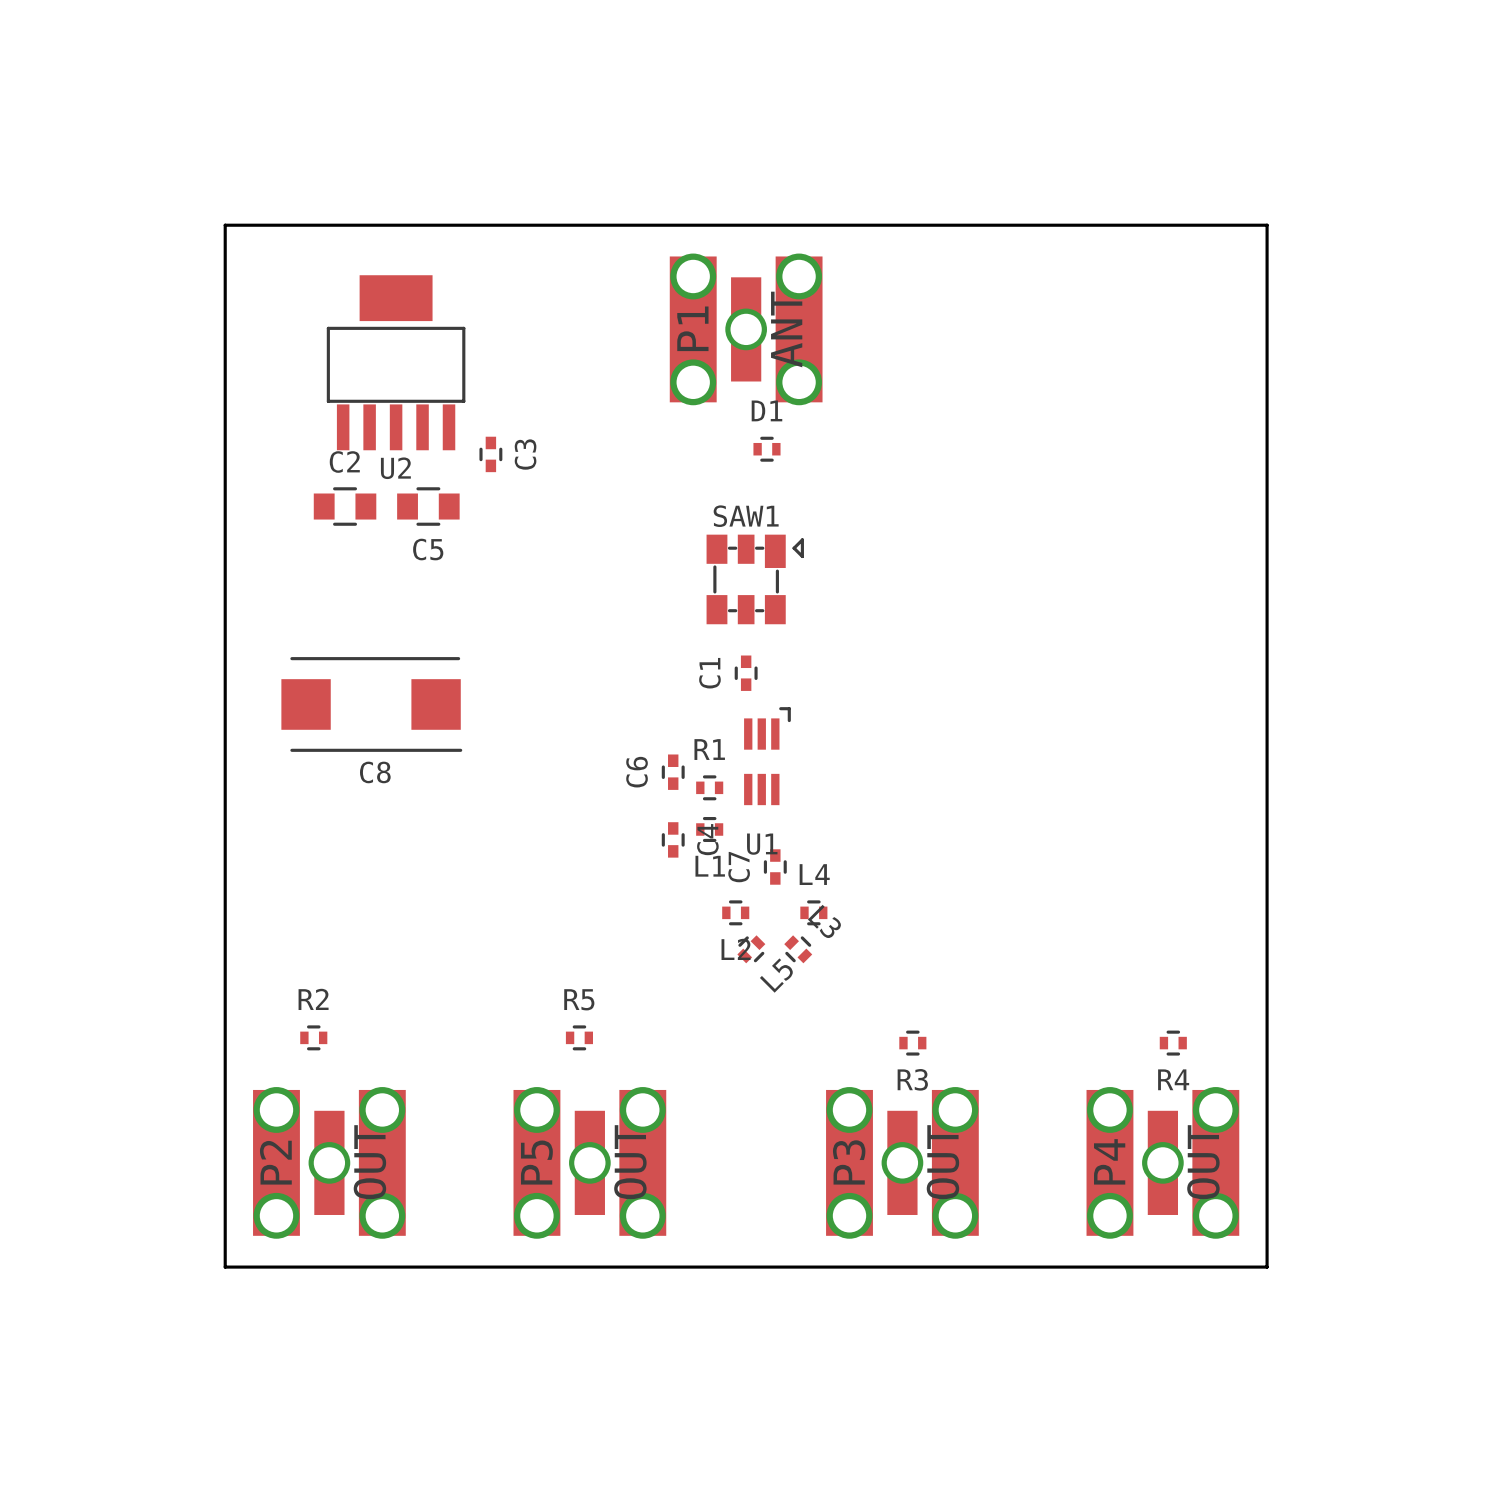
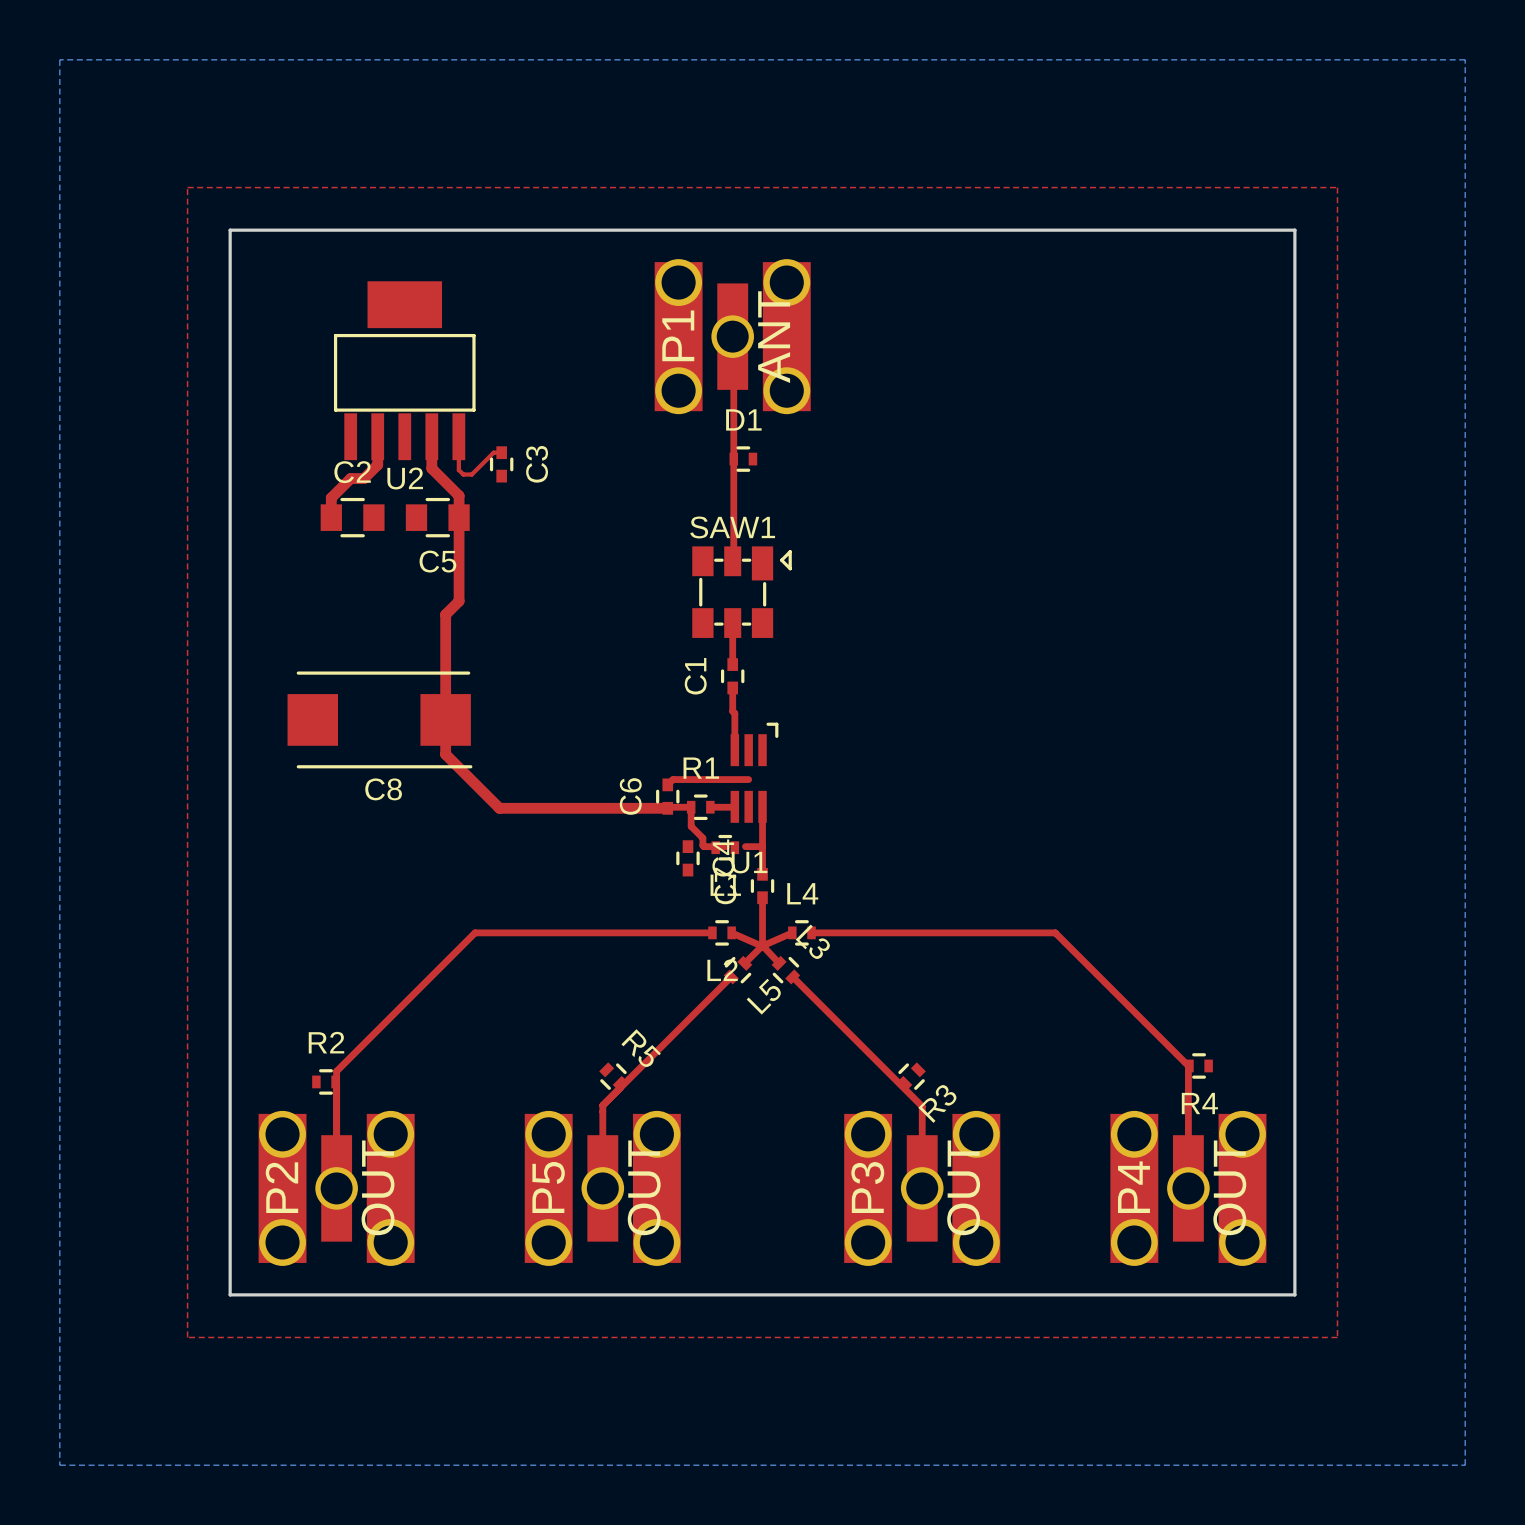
bottom zone outline: none -> (59, 59) (1465, 59) (1465, 1465) (59, 1465) (59, 59)
top zone outline: none -> (187, 187) (1337, 187) (1337, 1337) (187, 1337) (187, 187)
top track: none -> (732, 336) (732, 561)
P1 position: (746, 329) -> (732, 336)
top track: none -> (377, 436) (377, 464) (364, 478) (350, 478) (331, 497) (331, 517)
top track: none -> (431, 436) (431, 468) (459, 495) (459, 601) (445, 614) (445, 754) (499, 808) (691, 807) (691, 826) (702, 838) (702, 845) (726, 846)
top track: none -> (458, 436) (458, 470) (463, 474) (471, 474) (493, 452) (501, 452)
D1 position: (766, 449) -> (743, 459)
SAW1 position: (755, 579) -> (742, 592)
top track: none -> (732, 623) (732, 664)
top track: none -> (732, 687) (734, 750)
C1 position: (746, 673) -> (732, 676)
U1 position: (767, 756) -> (754, 772)
top track: none -> (748, 779) (673, 779) (667, 784)
C6 position: (673, 772) -> (667, 796)
R1 position: (709, 787) -> (700, 807)
top track: none -> (734, 806) (710, 807)
top track: none -> (762, 806) (762, 874)
top track: none -> (745, 846) (762, 846)
C7 position: (775, 867) -> (762, 886)
top track: none -> (762, 897) (762, 945)
top track: none -> (712, 932) (475, 932) (336, 1071) (336, 1188)
top track: none -> (731, 932) (761, 946) (792, 932)
L2 position: (735, 912) -> (722, 932)
top track: none -> (811, 932) (1055, 932) (1188, 1065) (1188, 1188) (1189, 1187)
L4 position: (813, 912) -> (801, 932)
top track: none -> (762, 945) (744, 963)
top track: none -> (762, 945) (779, 963)
L5 position: (751, 949) -> (738, 970)
L3 position: (798, 949) -> (785, 970)
top track: none -> (731, 976) (602, 1105) (602, 1188)
top track: none -> (792, 976) (922, 1106) (922, 1188) (923, 1187)
R2 position: (313, 1037) -> (325, 1081)
R5 rotation: 0° (579, 1037) -> 45° clockwise (613, 1076)
R5 position: (579, 1037) -> (613, 1076)
R3 rotation: 0° (912, 1043) -> 45° counterclockwise (911, 1076)
R3 position: (912, 1043) -> (911, 1076)

